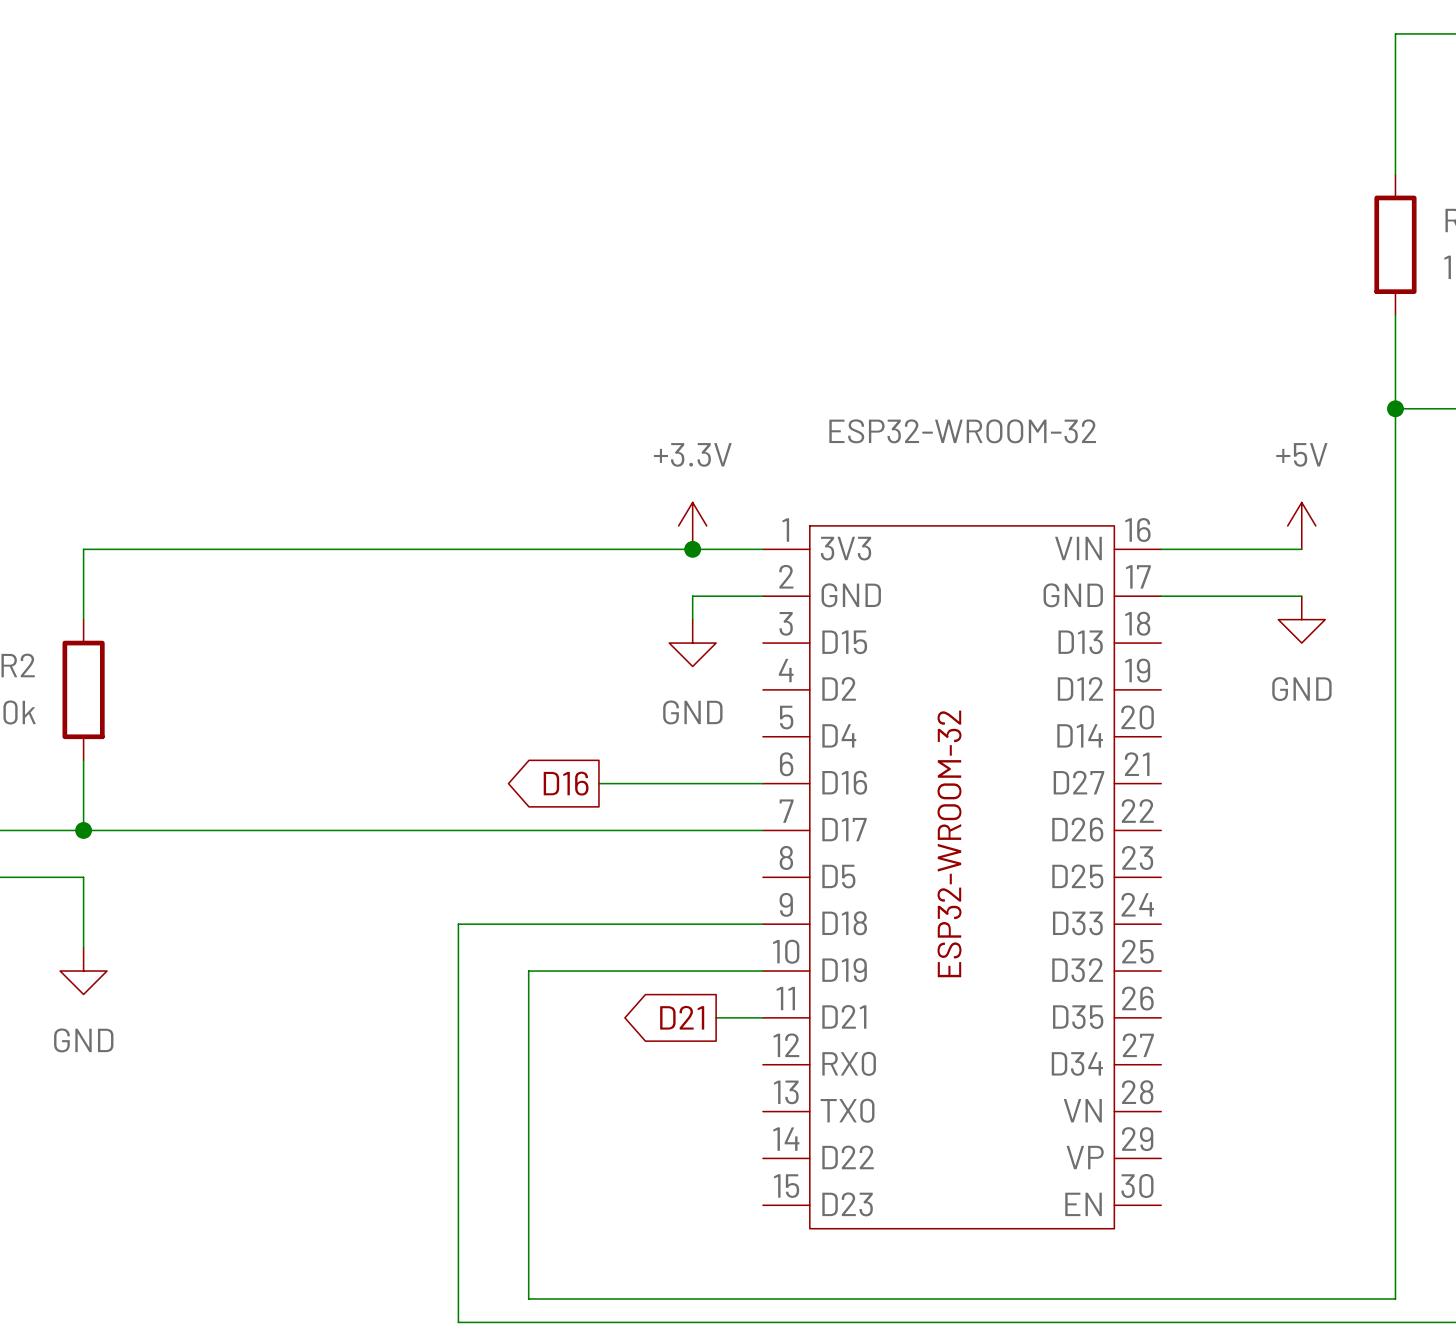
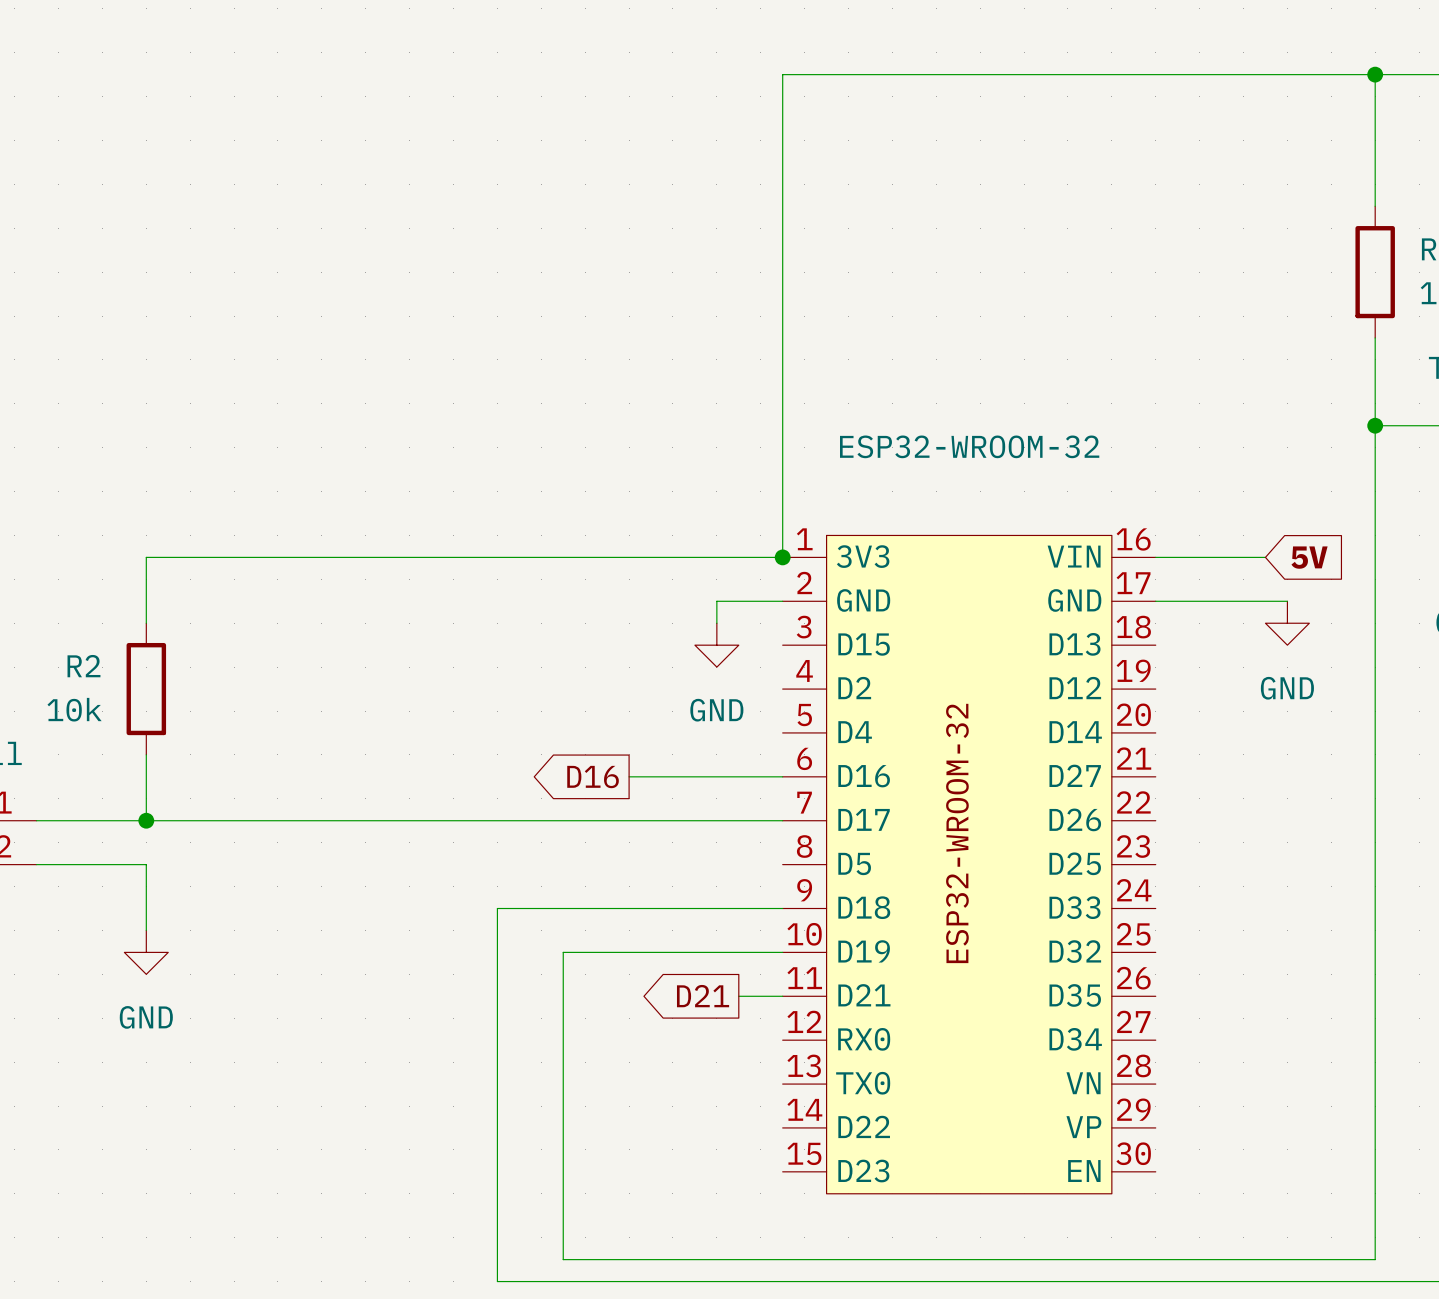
wire: none -> (1375, 74) (782, 74) (782, 557)
junction: none -> (1375, 74)
power symbol: +3.3V (692, 525) -> none
power symbol: +5V (1301, 525) -> none
junction position: (692, 549) -> (782, 557)
wire: (1278, 549) (1301, 549) -> none
global label: none -> 5V (1309, 557)

